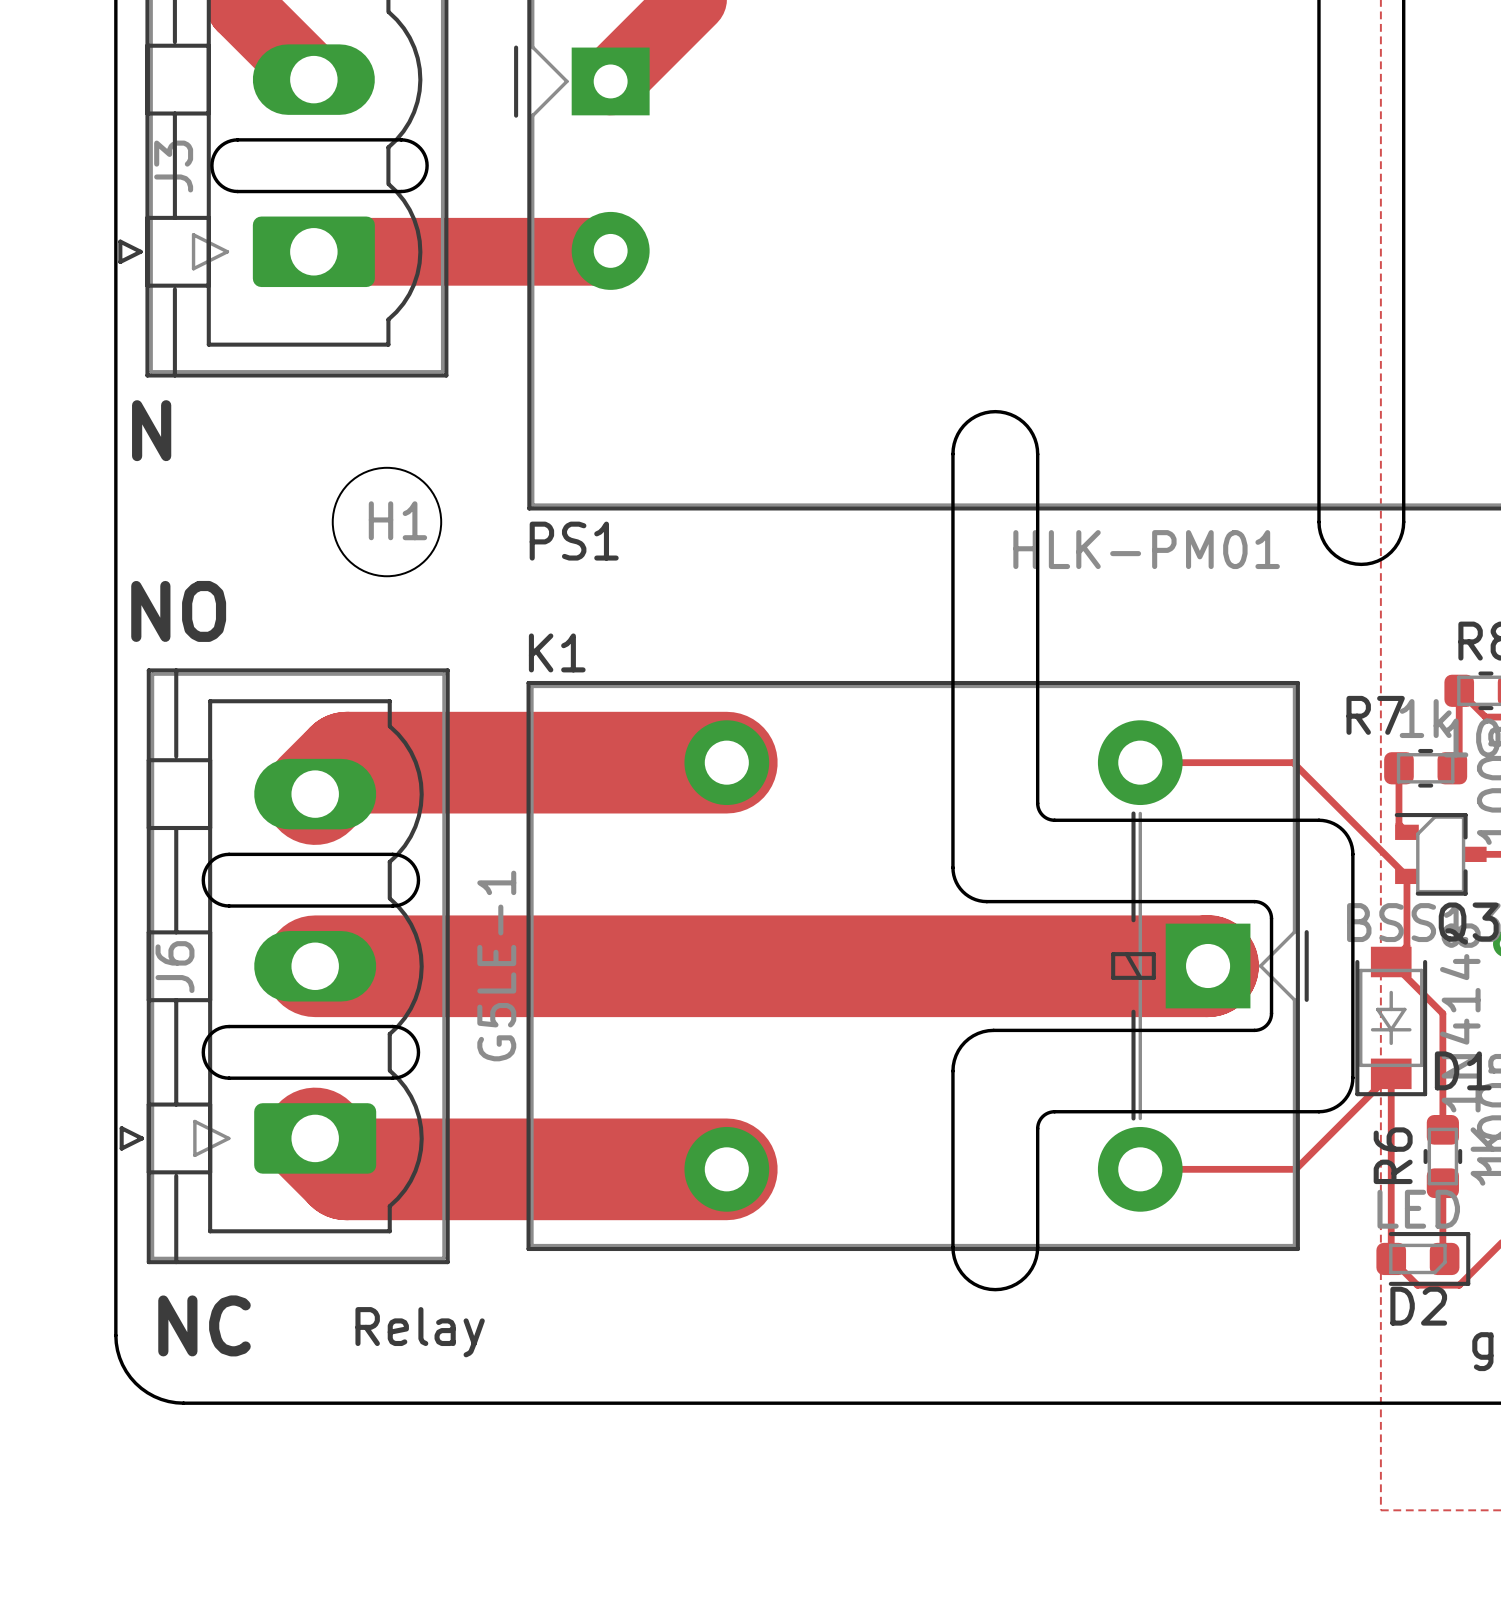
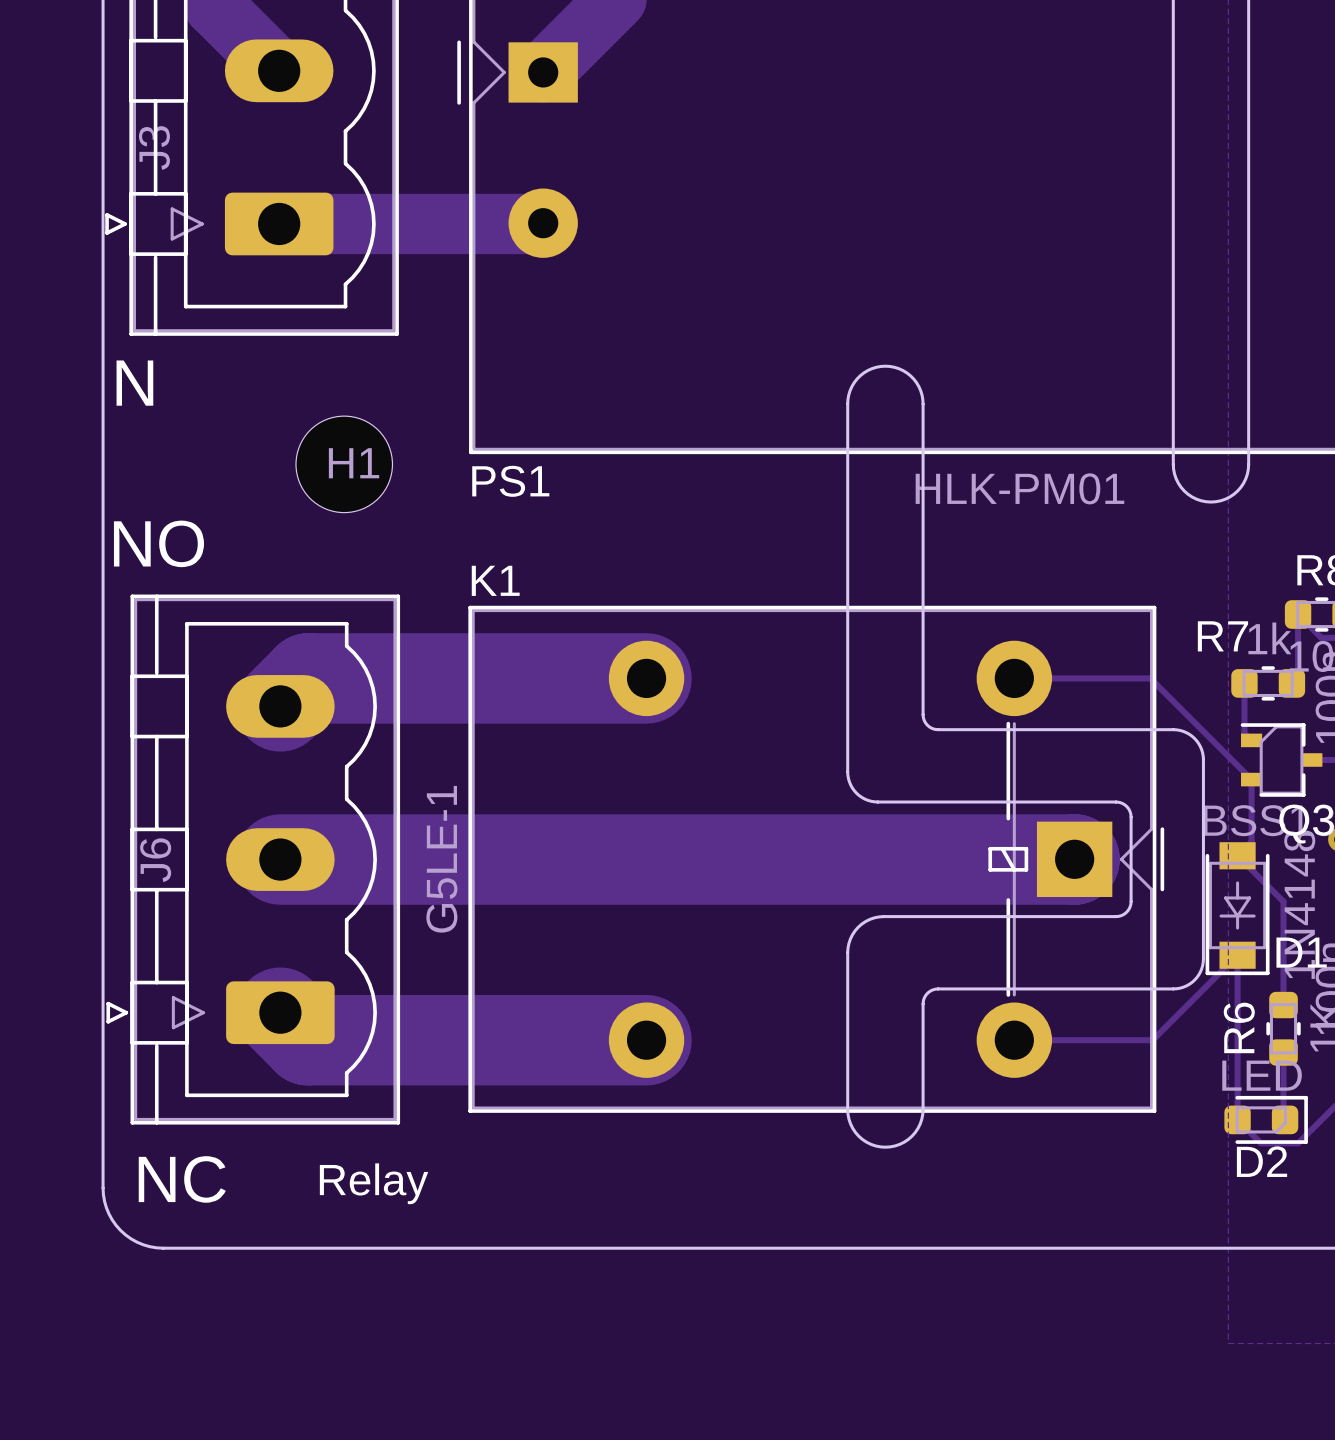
board edge: (237, 139) (404, 140) (415, 144) (422, 151) (426, 159) (426, 168) (424, 177) (418, 185) (404, 191) (234, 191) (224, 188) (217, 181) (212, 172) (212, 162) (219, 147) (227, 141) (237, 139) -> none
board edge: (229, 854) (396, 854) (405, 857) (413, 864) (417, 873) (418, 883) (410, 898) (396, 905) (225, 905) (216, 902) (208, 895) (203, 880) (205, 870) (210, 861) (219, 856) (229, 854) -> none
board edge: (229, 1026) (395, 1026) (404, 1029) (412, 1035) (416, 1043) (418, 1055) (415, 1064) (409, 1071) (395, 1077) (225, 1077) (216, 1074) (208, 1068) (203, 1052) (205, 1042) (210, 1034) (219, 1028) (229, 1026) -> none

